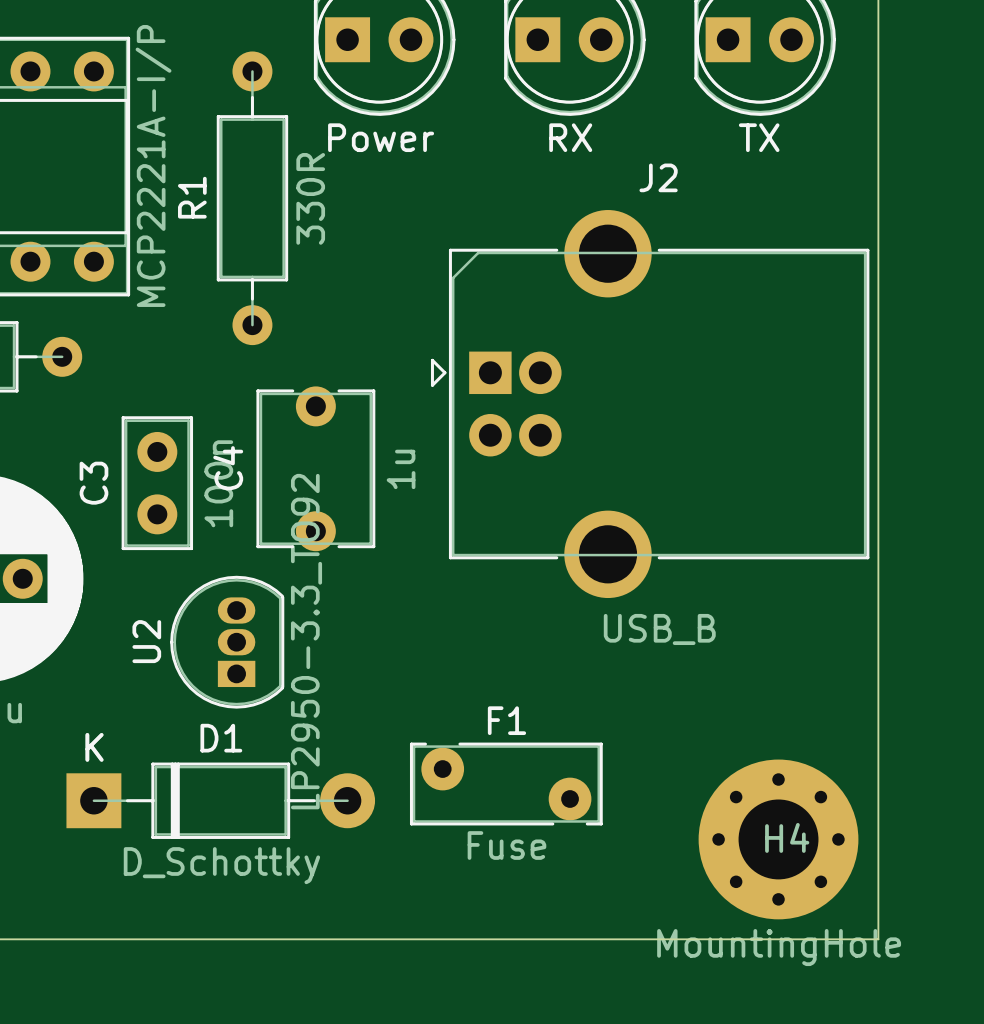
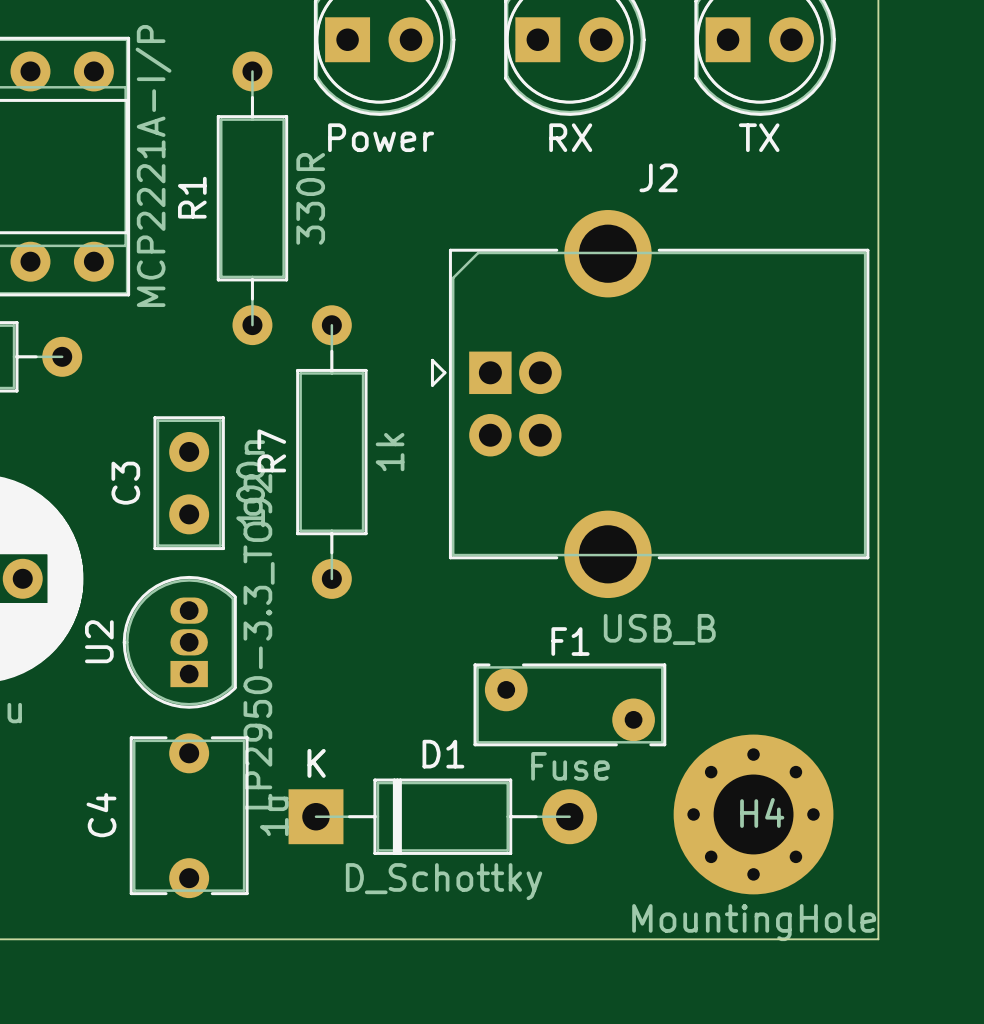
R7: none -> 1k (331, 452)
C4 position: (315, 468) -> (189, 815)
C3 position: (157, 483) -> (189, 483)
U2 position: (227, 642) -> (179, 642)
F1 position: (506, 784) -> (569, 704)
D1 position: (220, 800) -> (442, 816)
H4 position: (778, 839) -> (753, 814)

